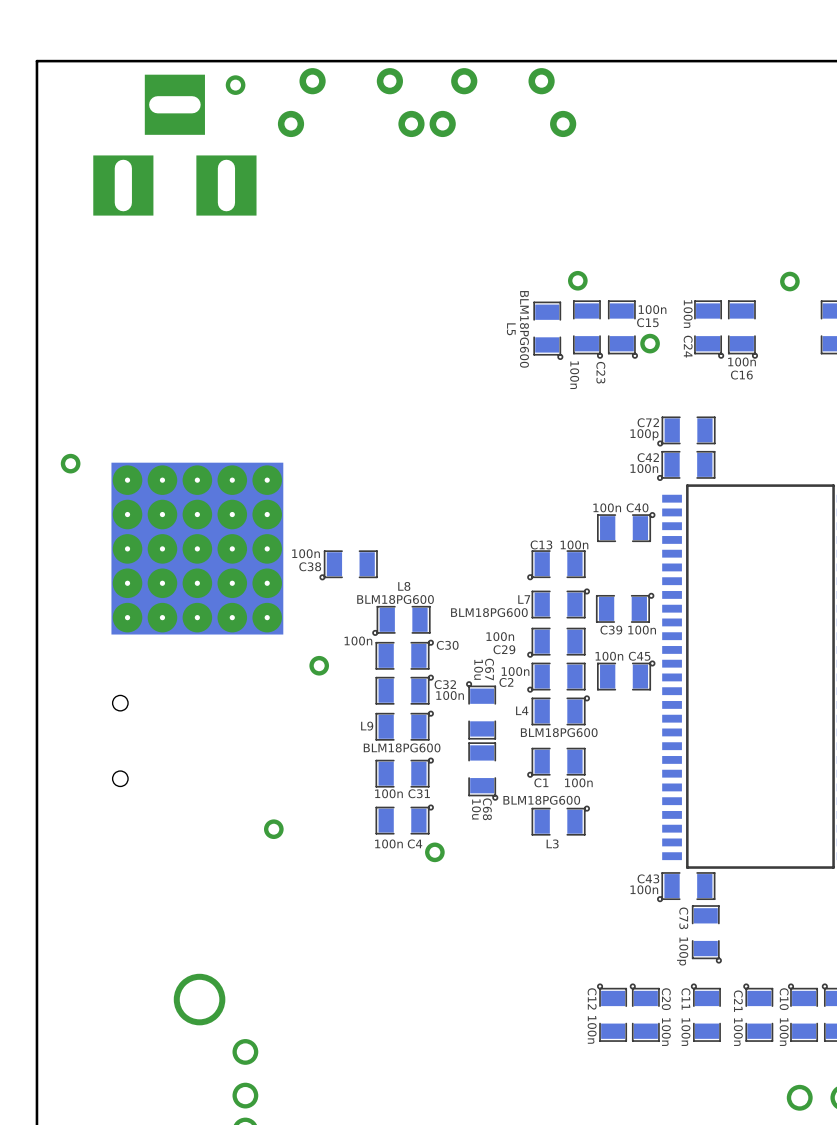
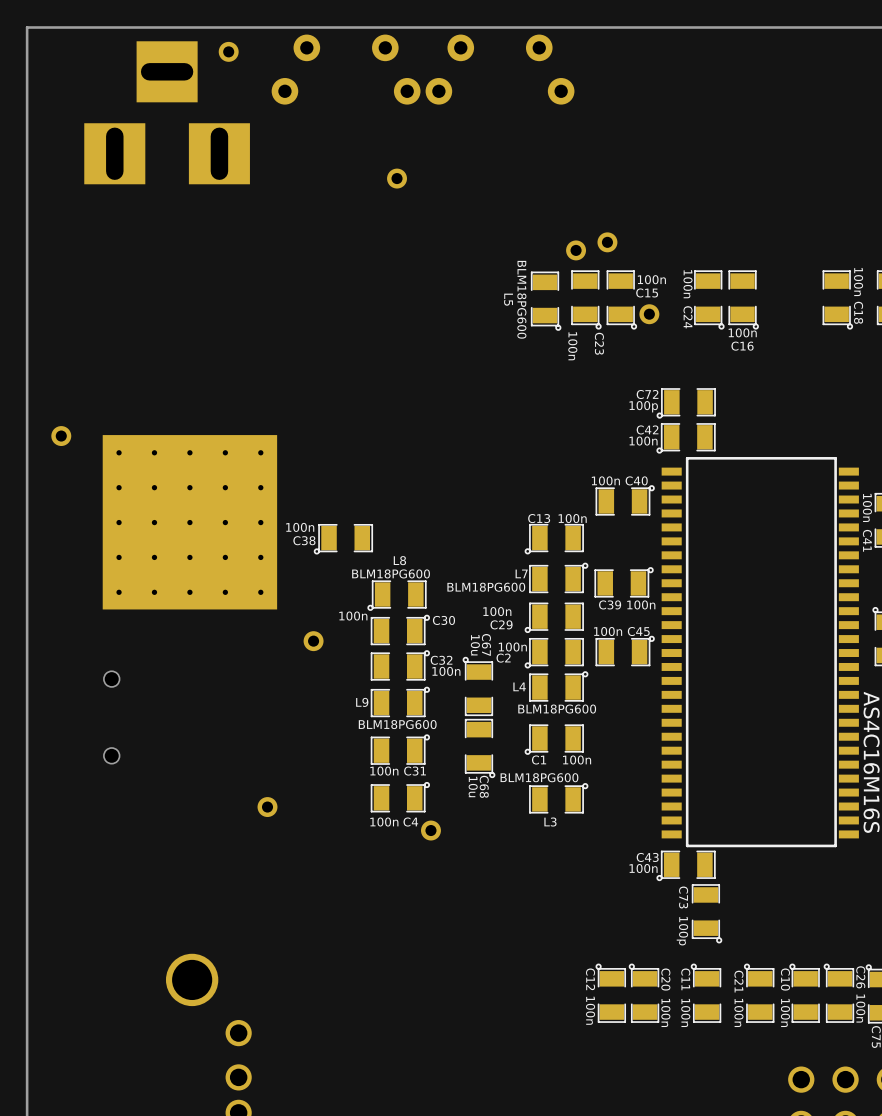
part: none -> (397, 178)
part position: (789, 281) -> (607, 242)

